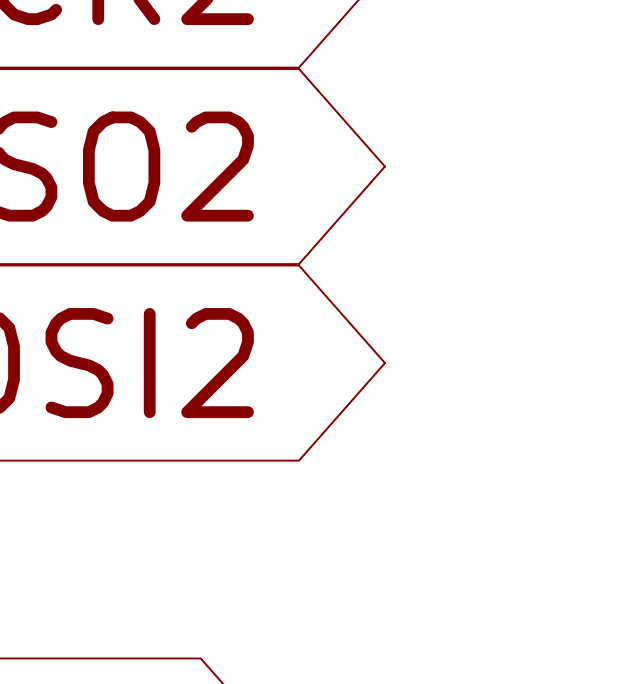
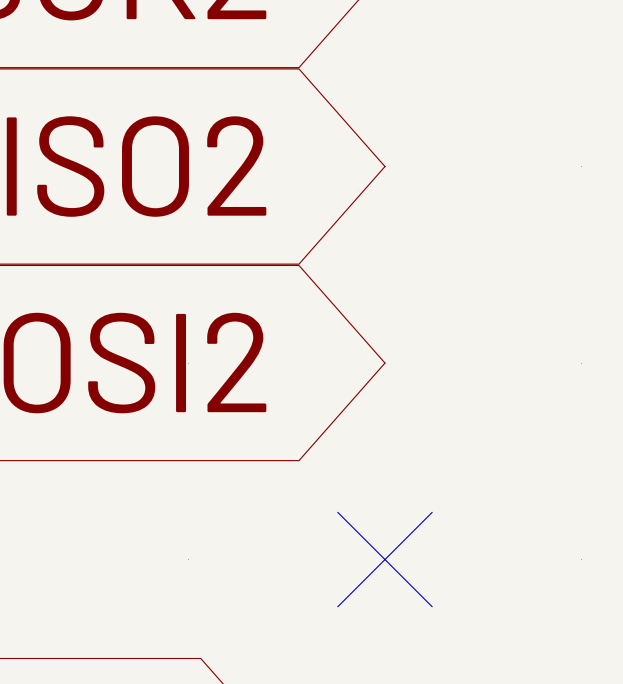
no-connect mark: none -> (384, 559)

